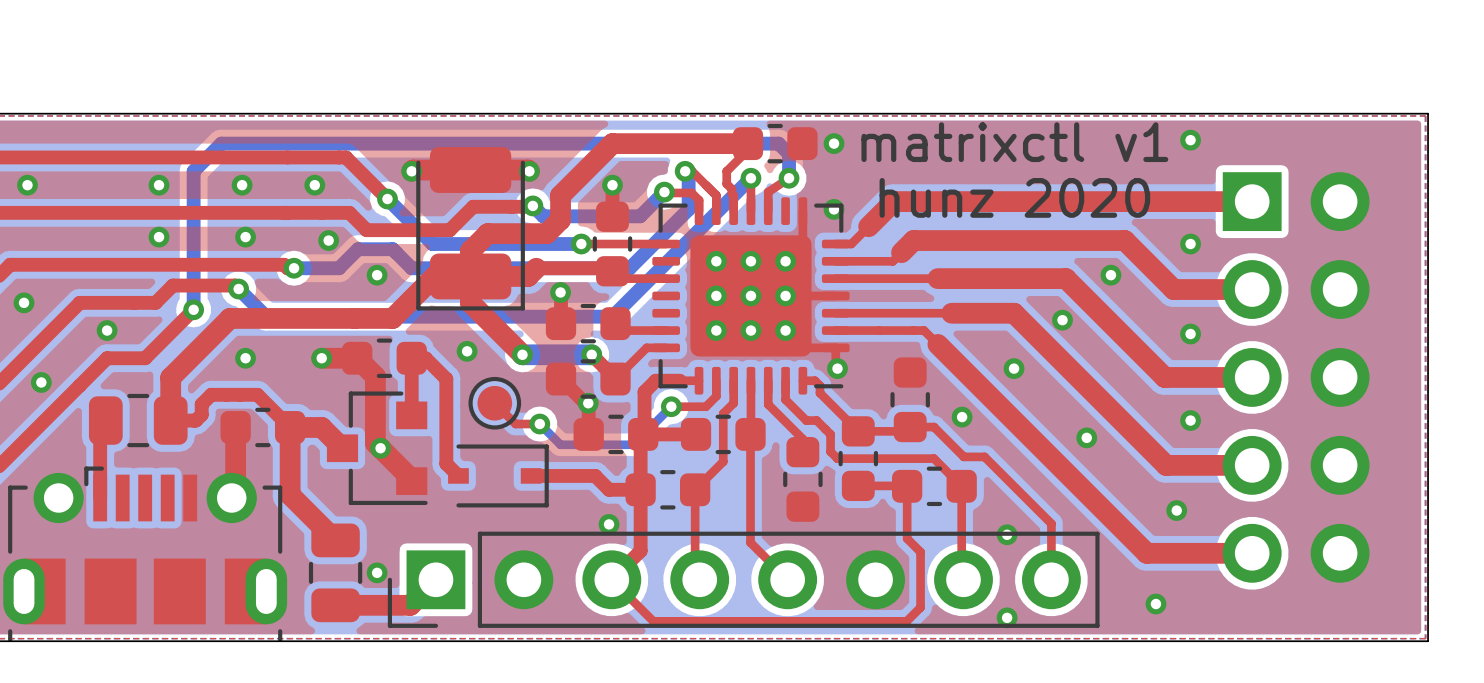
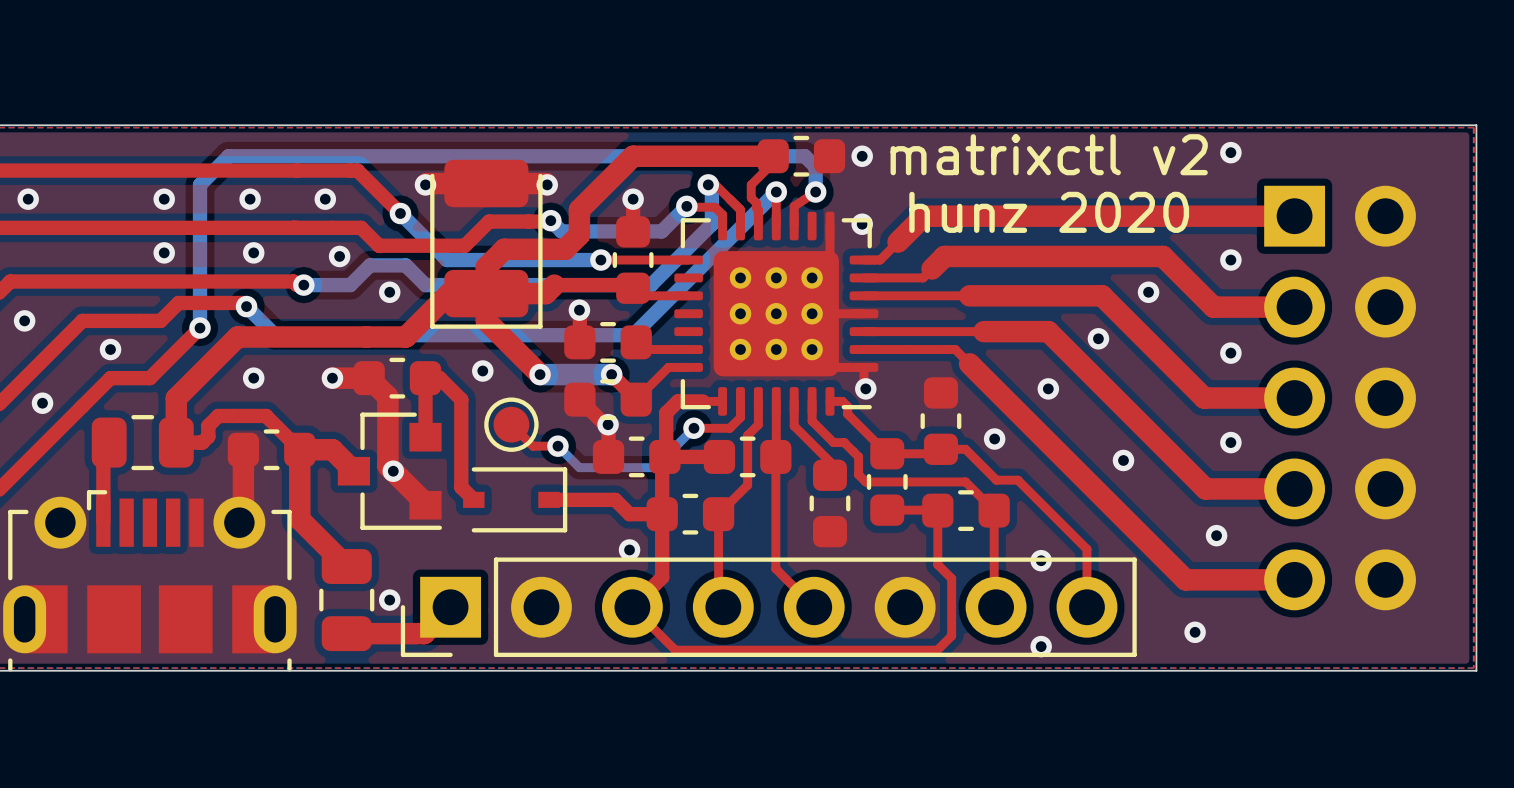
text: matrixctl v1 (1014, 142) -> matrixctl v2 (1049, 154)

